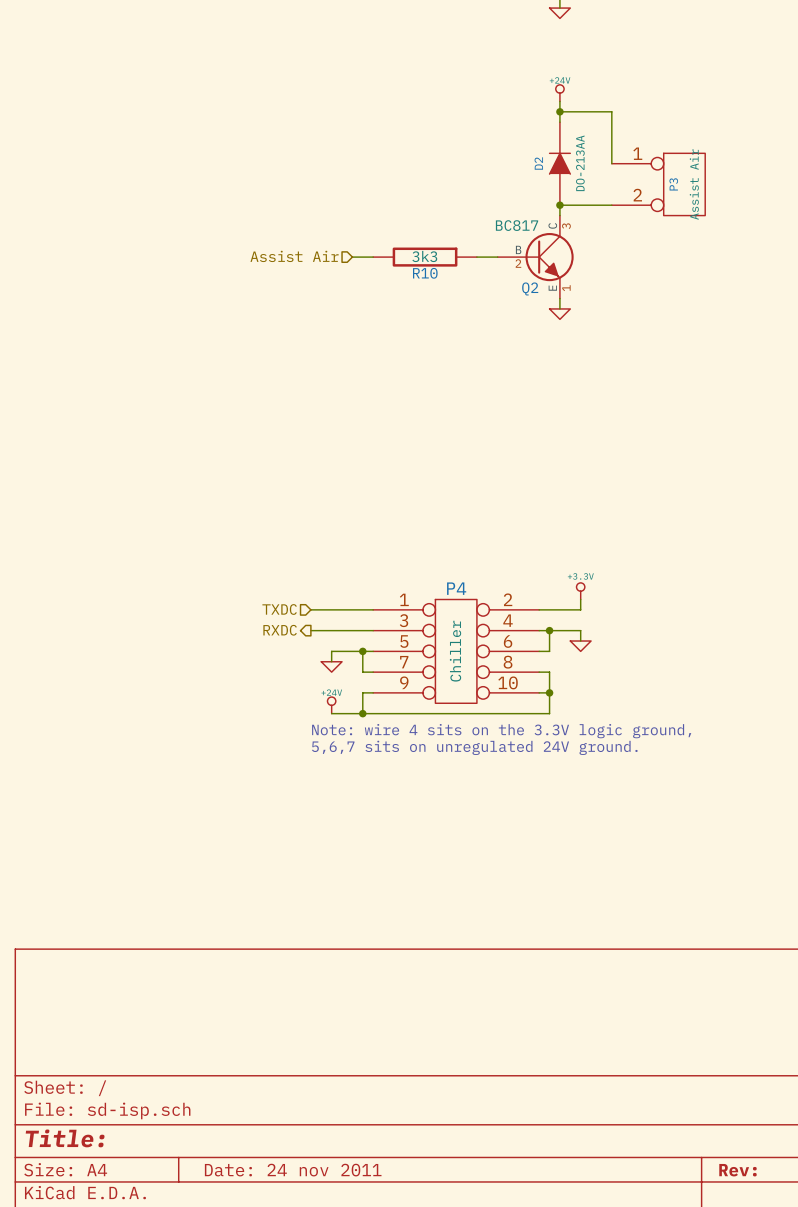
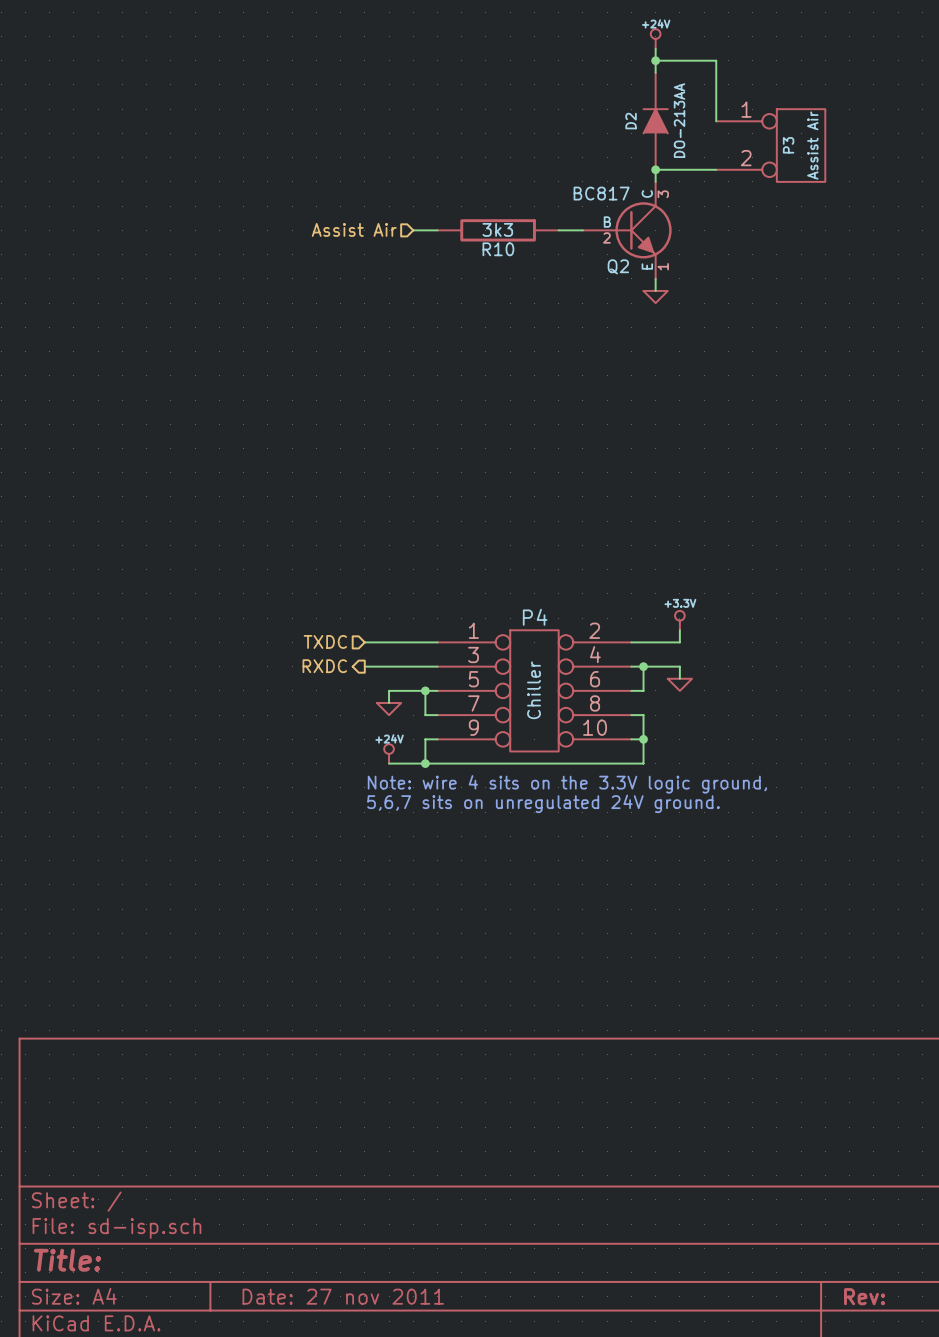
title block: Date: 24 nov 2011 (293, 1170) -> Date: 27 nov 2011 (343, 1296)

